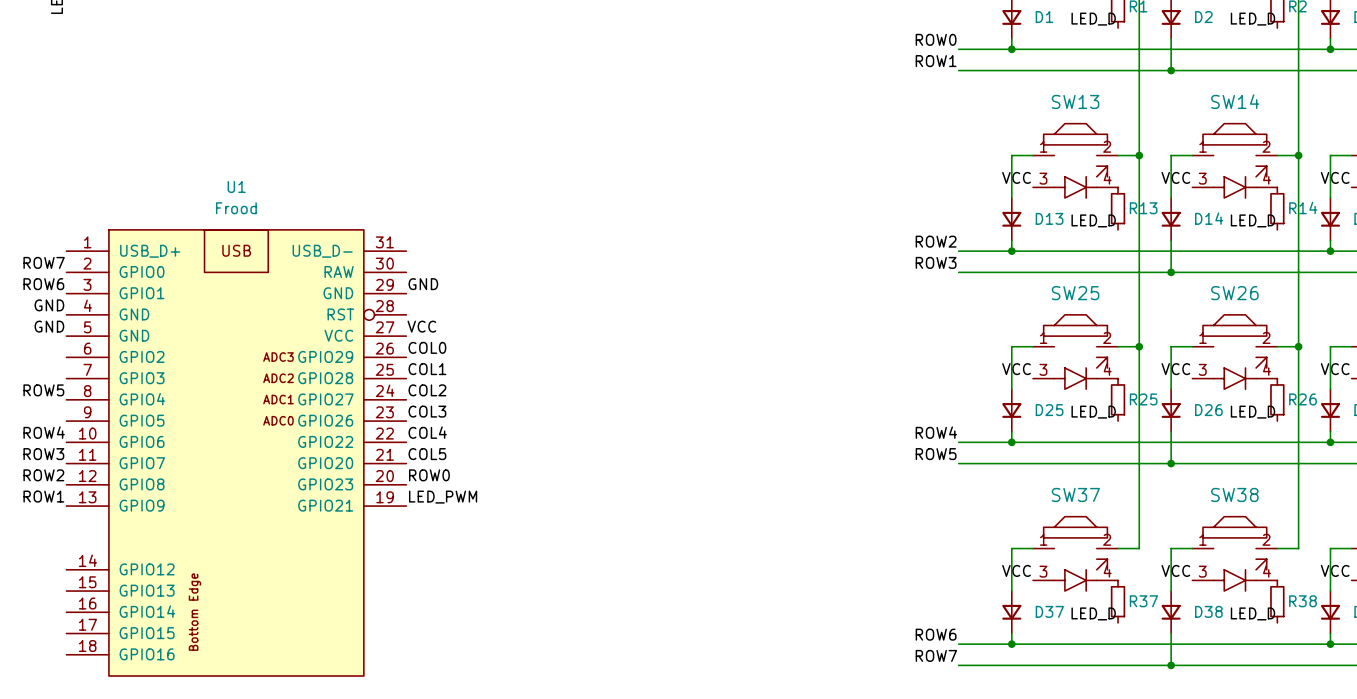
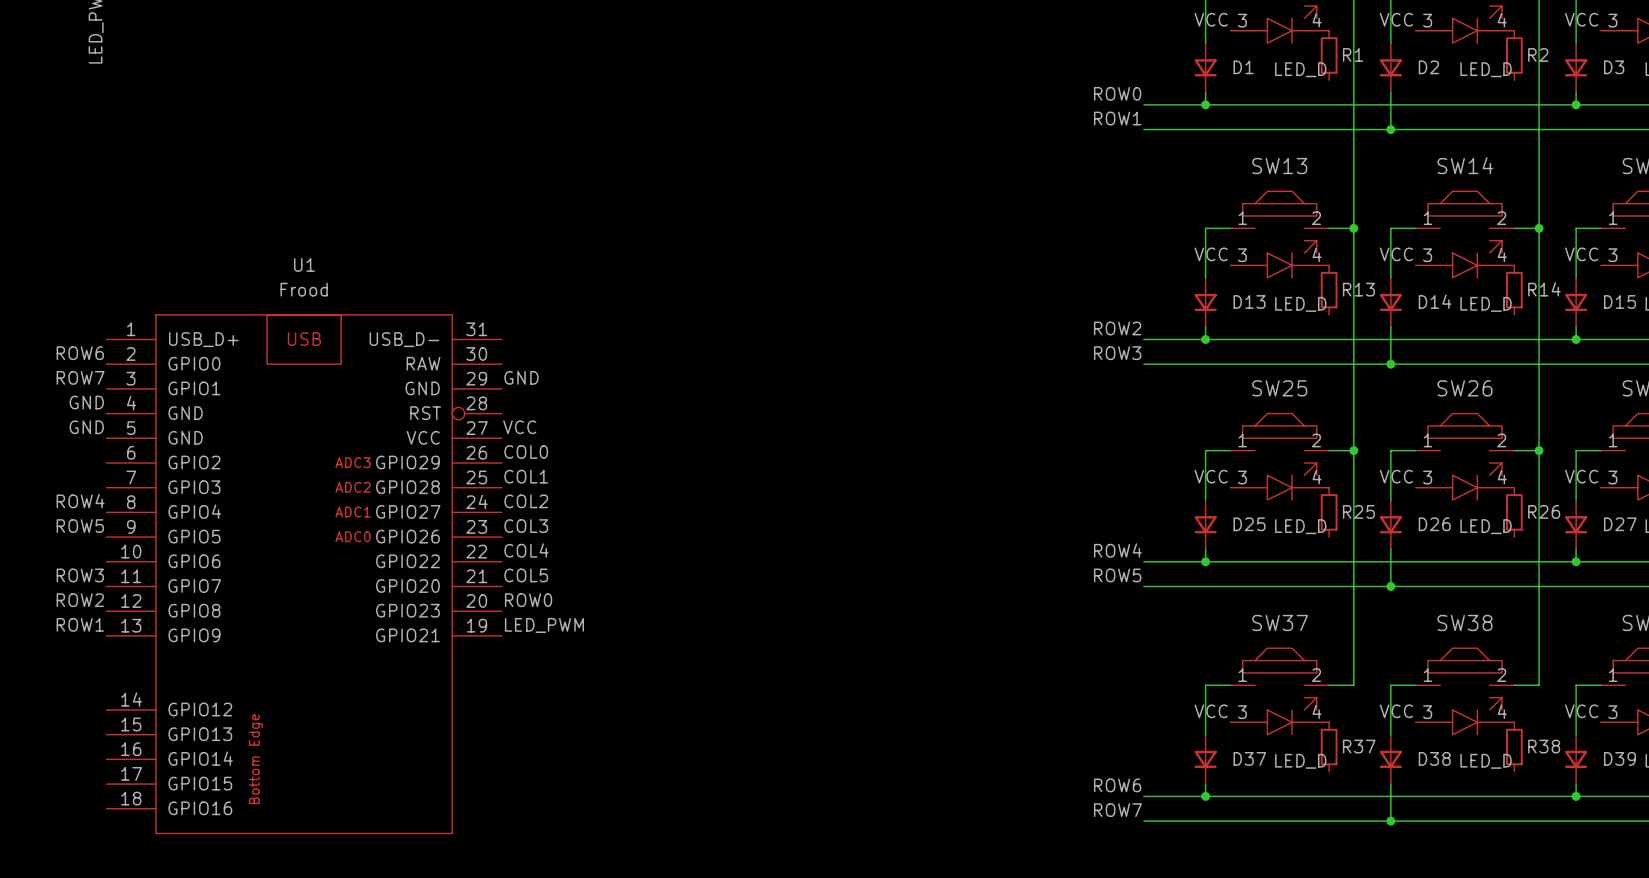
label: ROW7 (44, 262) -> ROW6 (80, 353)
label: ROW6 (43, 284) -> ROW7 (80, 377)
label: ROW5 (43, 390) -> ROW4 (80, 501)
label: ROW4 (44, 432) -> ROW5 (80, 526)

